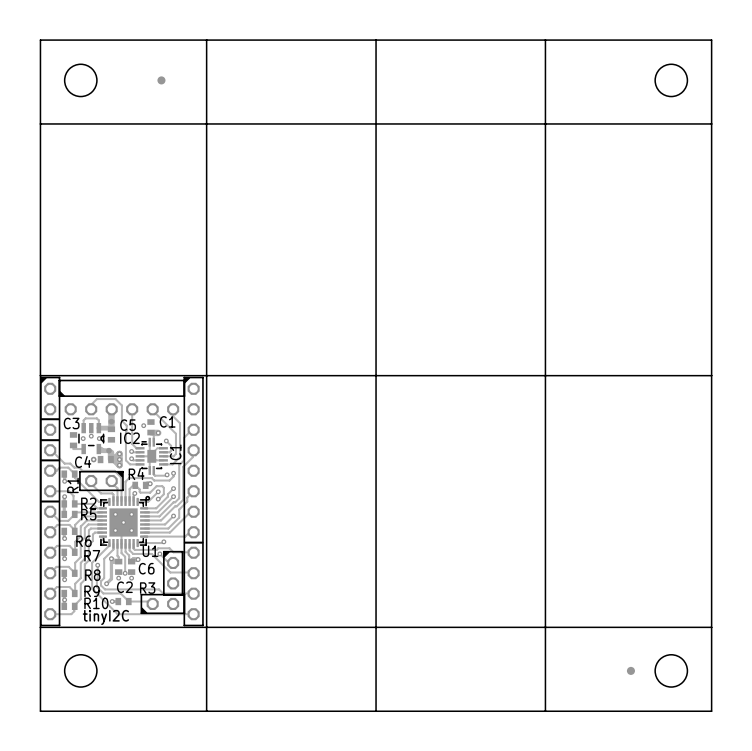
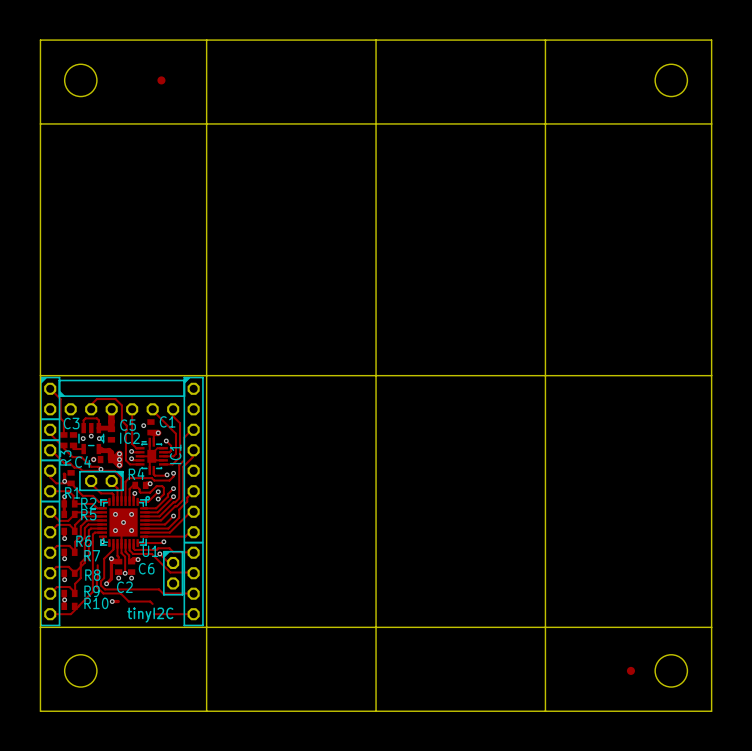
track: none -> (50, 388) (60, 399) (60, 418) (63, 421) (63, 434)
track: none -> (50, 429) (50, 433) (63, 445) (63, 448) (72, 457) (81, 457) (91, 466) (98, 466) (100, 469)
via: none -> (100, 469)
track: (50, 470) (68, 467) (74, 474) (74, 477) (92, 495) -> (50, 470) (50, 477) (56, 483) (71, 483) (82, 495) (92, 495)
R1 rotation: 0° (69, 474) -> 90° clockwise (71, 478)
track: (80, 545) (80, 557) (75, 562) (75, 572) -> (84, 558) (84, 562) (75, 572)
track: (109, 545) (92, 562) (92, 588) (117, 614) (153, 614) -> none
track: (88, 560) (84, 564) (84, 579) (80, 583) (80, 599) (74, 605) (74, 611) (70, 614) -> (92, 541) (92, 591) (70, 614)
via: (97, 565) -> none
R3 rotation: 0° (123, 601) -> 90° clockwise (63, 440)
R3 position: (123, 601) -> (63, 440)
part: (162, 603) -> none
text position: tinyI2C (105, 617) -> tinyI2C (150, 615)

